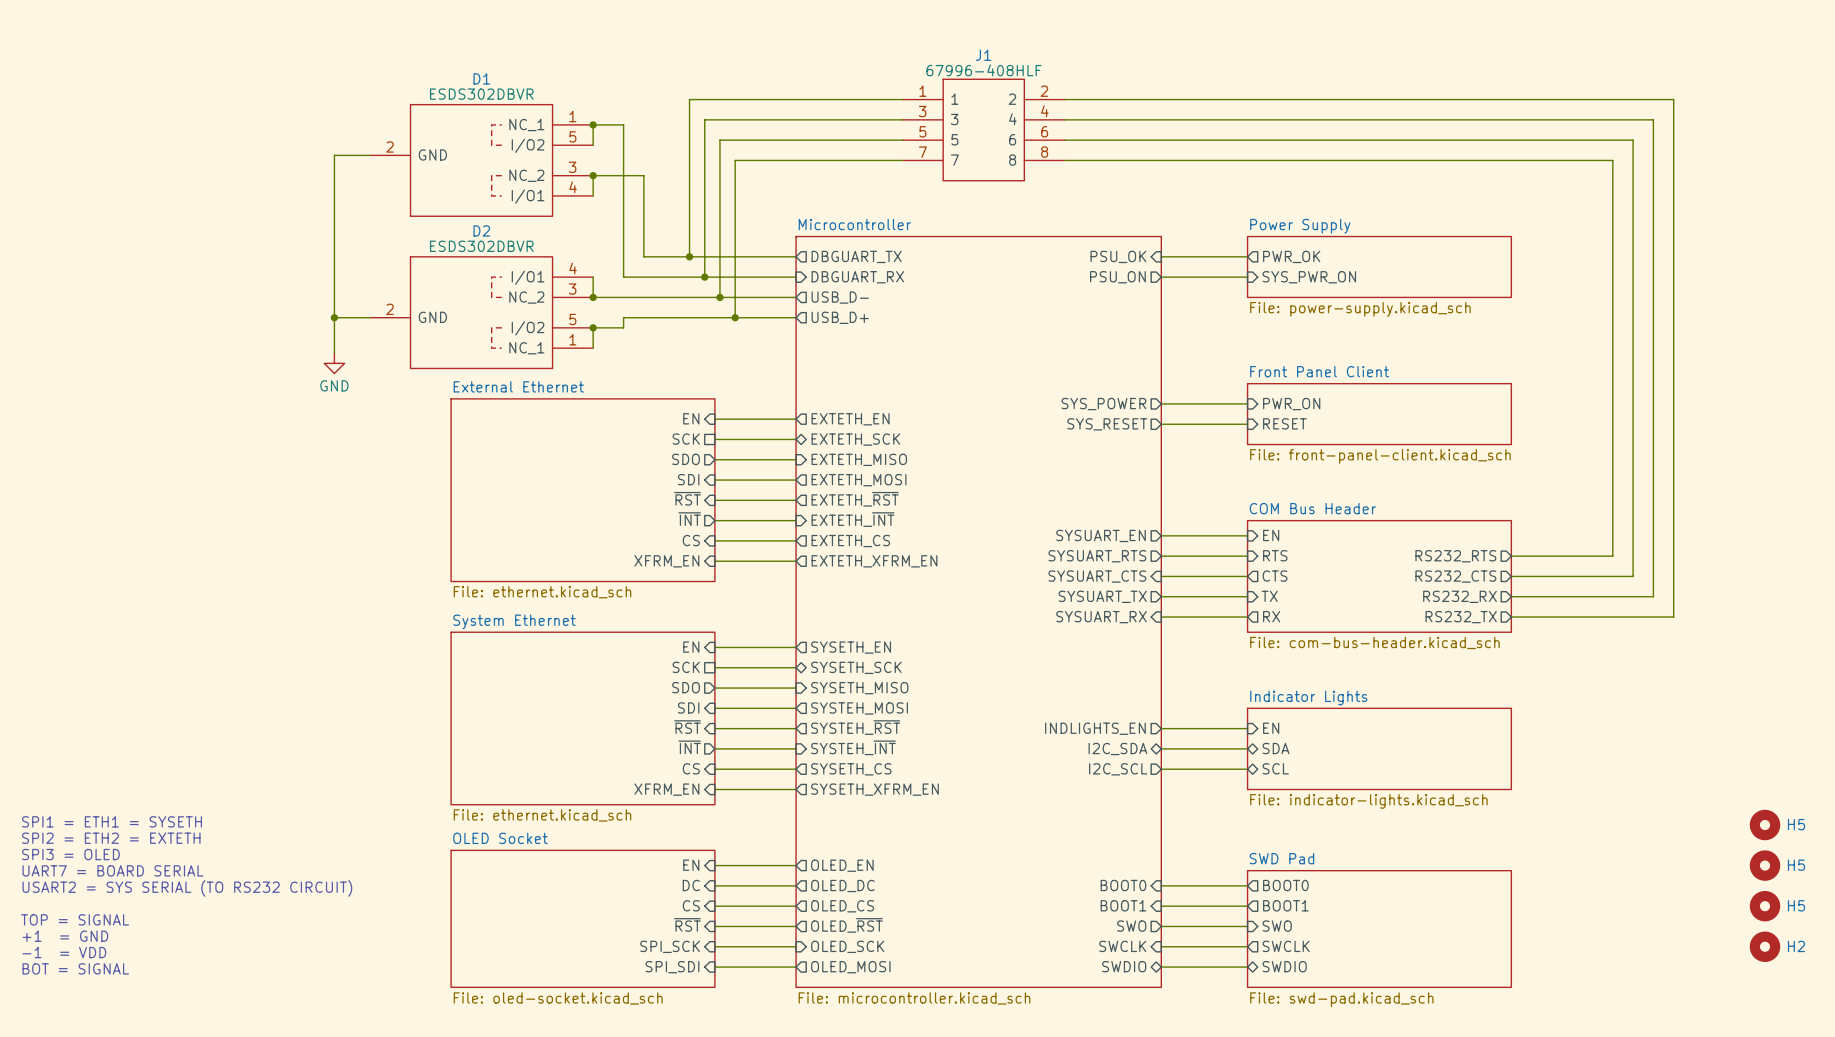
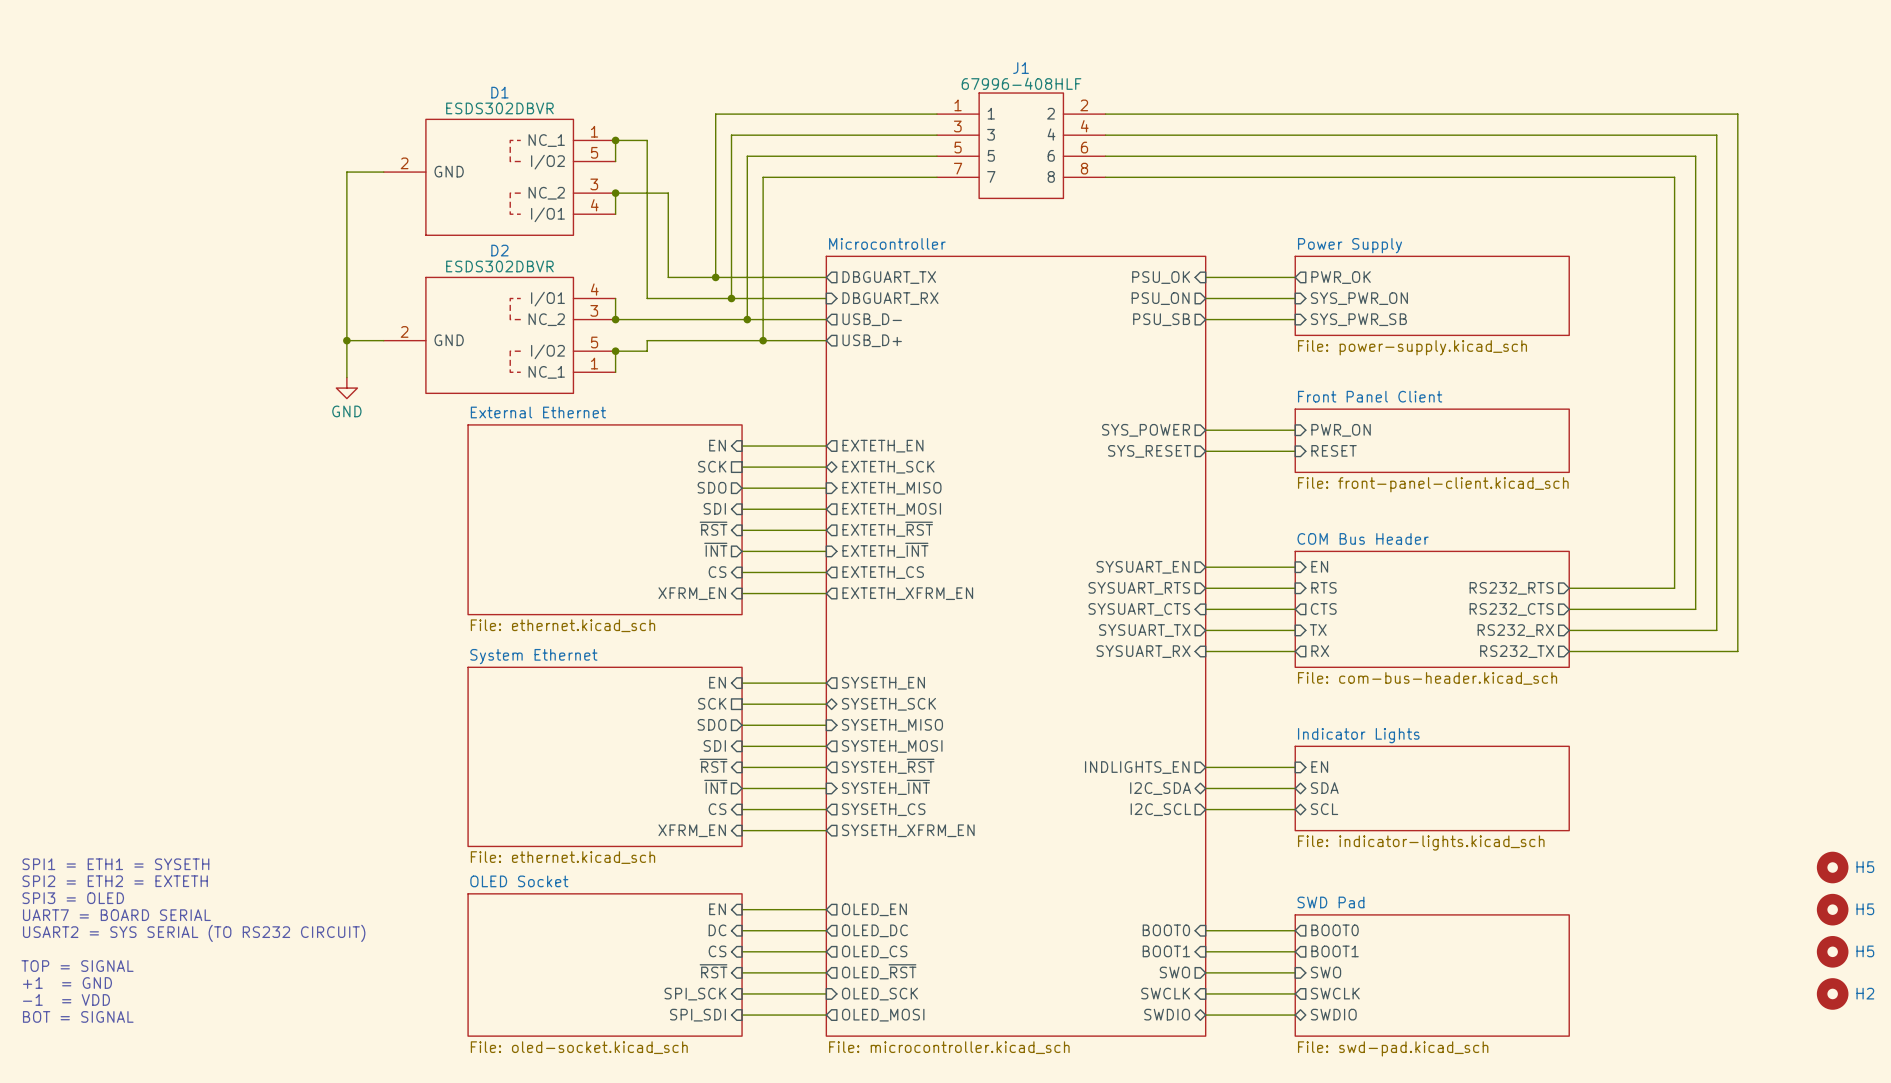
sheet Power Supply shape: [1246, 235, 1512, 299] -> [1294, 255, 1570, 337]
sheet pin: none -> PSU_SB (1161, 319)
wire: none -> (1205, 319) (1295, 319)
sheet pin: none -> SYS_PWR_SB (1358, 319)

